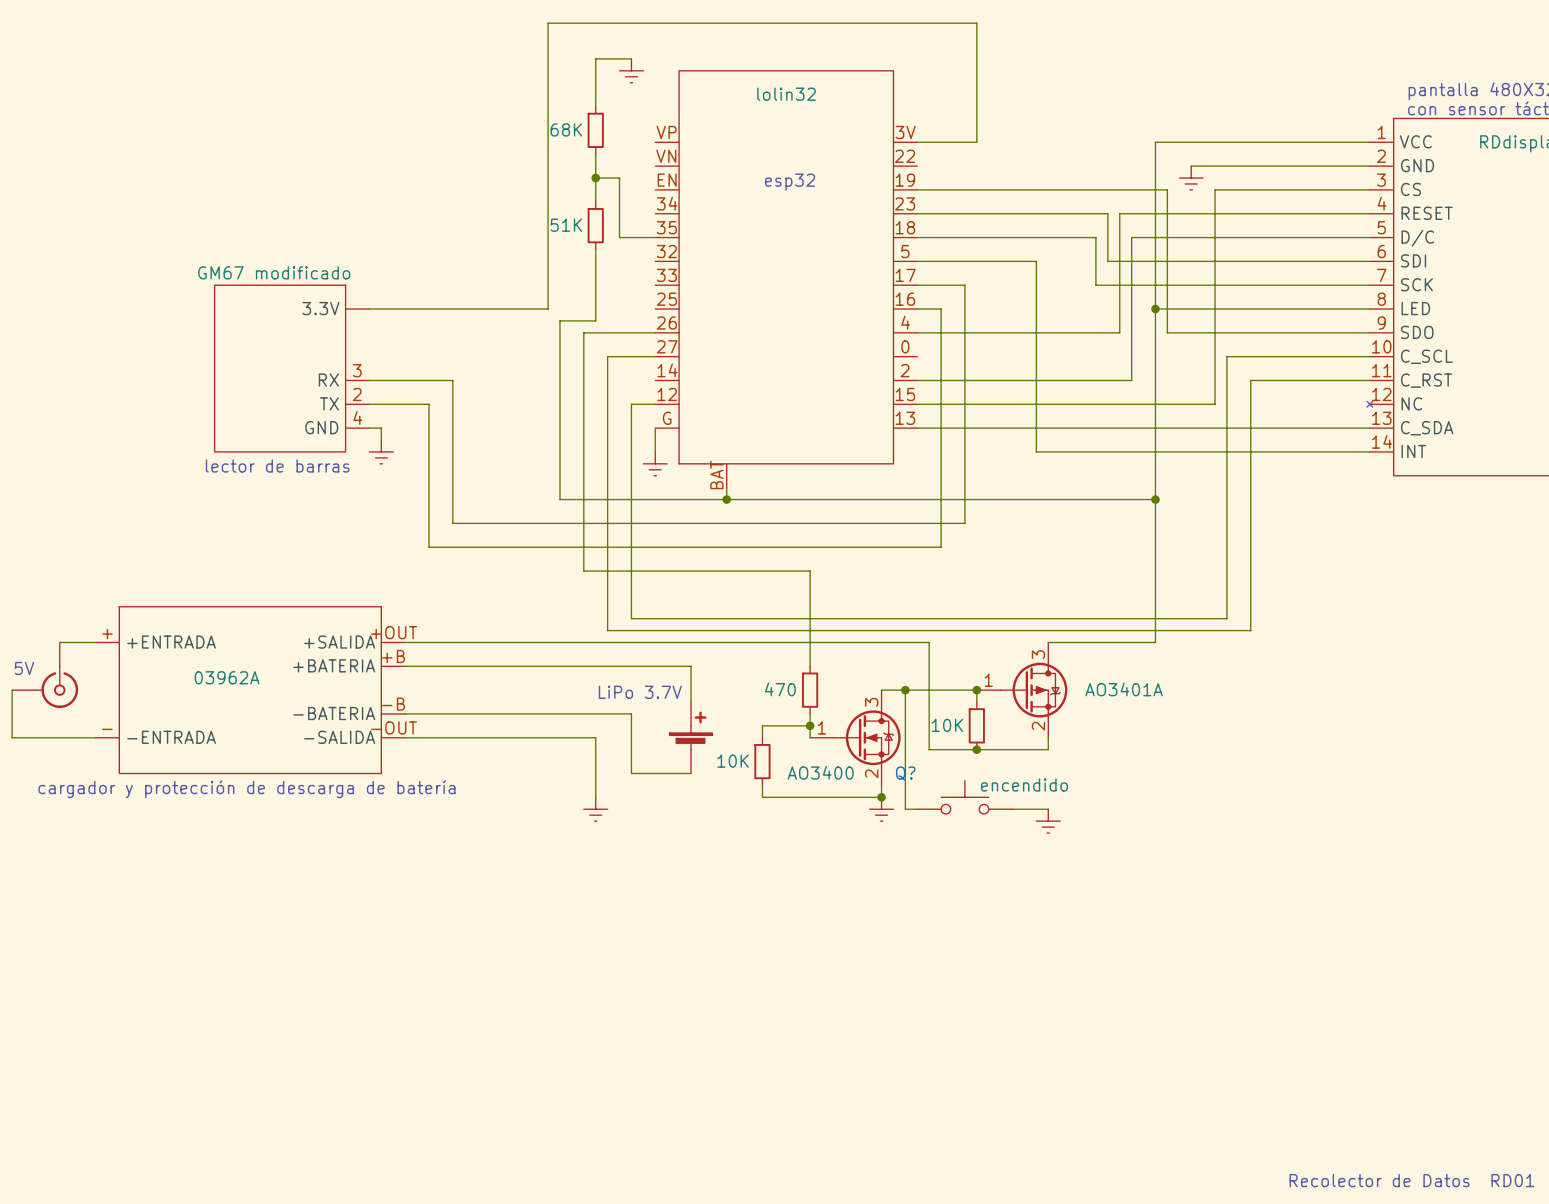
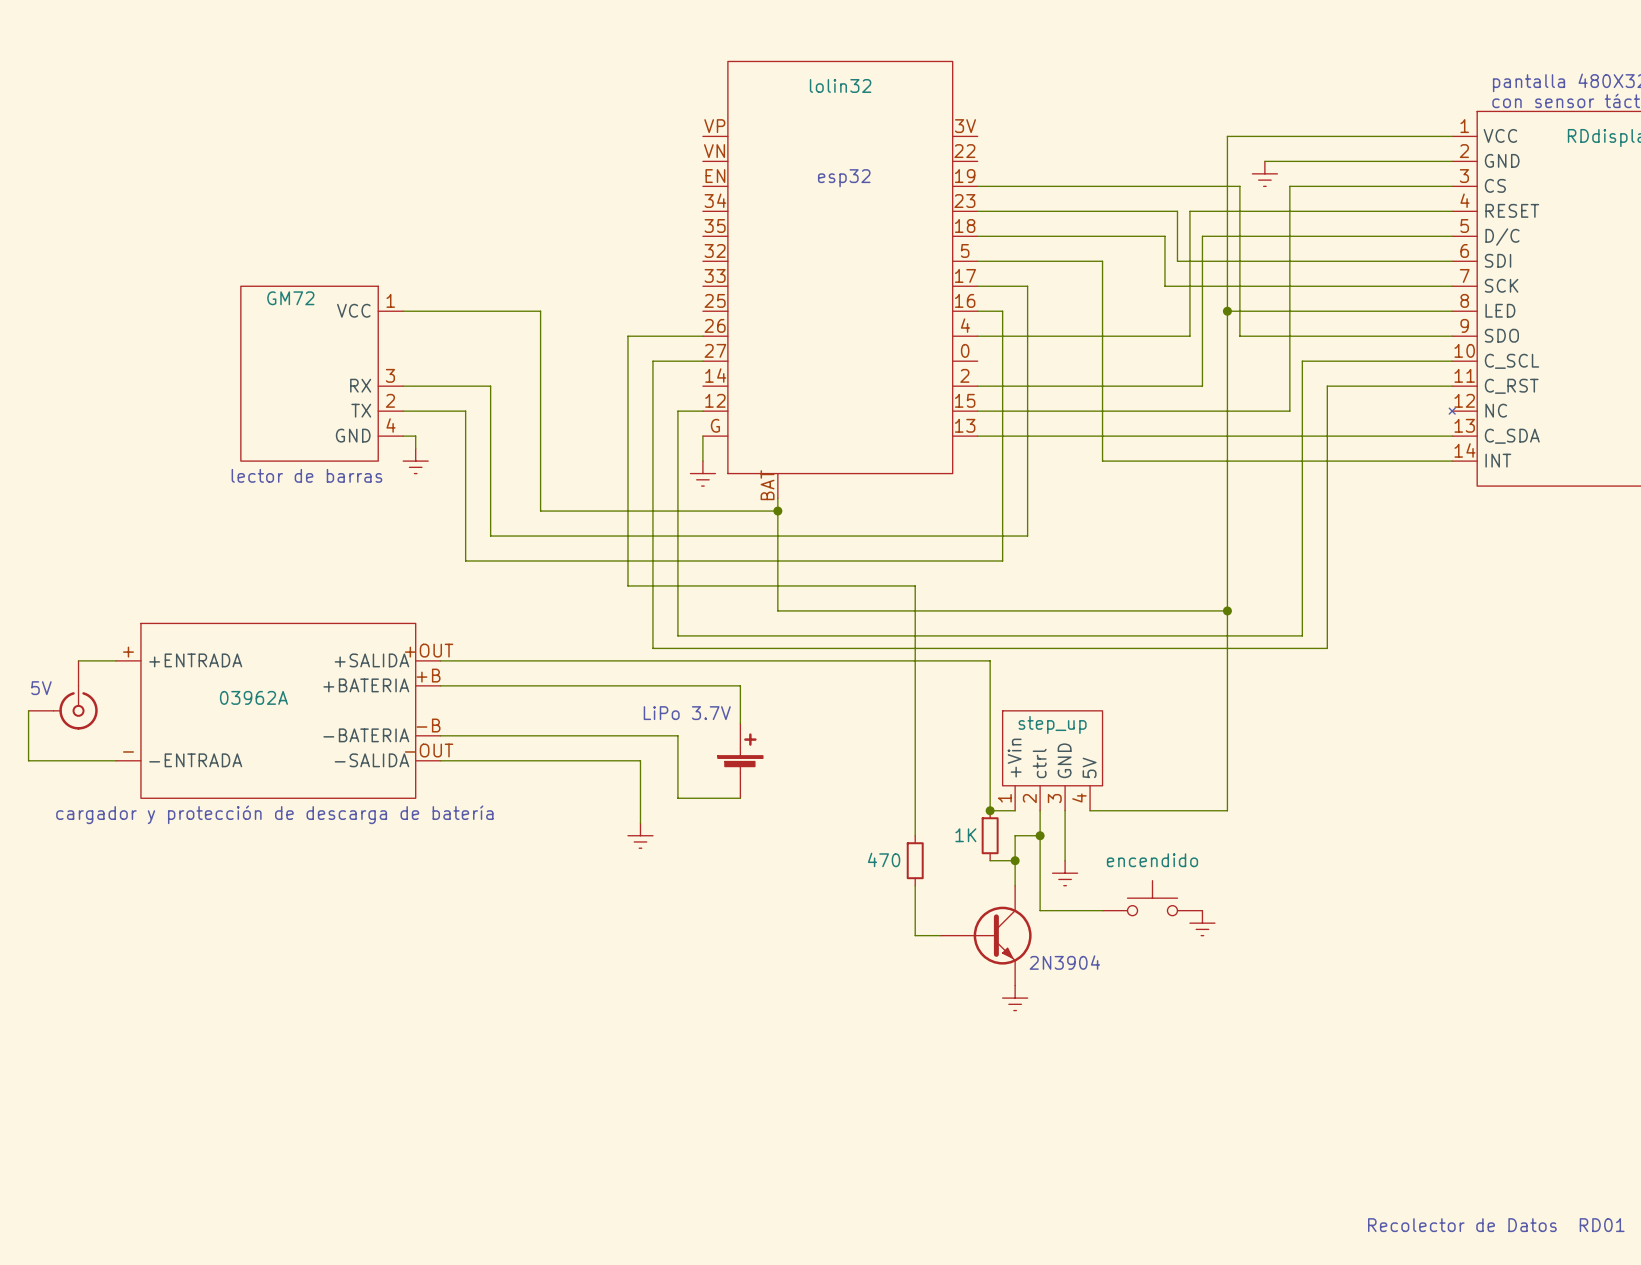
wire: (631, 58) (595, 58) (595, 106) -> none
power symbol: (631, 70) -> none
part: 68K (595, 130) -> none
wire: (917, 142) (976, 142) (976, 23) (548, 23) (548, 309) (500, 309) -> none
wire: (595, 154) (595, 201) -> none
wire: (595, 178) (619, 178) (619, 237) (655, 237) -> none
junction: (595, 178) -> none
part: 51K (595, 225) -> none
wire: (595, 249) (595, 320) (559, 320) (559, 499) -> (540, 311) (540, 511) (603, 511)
part value: GM67 modificado (274, 272) -> GM72 (290, 298)
part pin number: none -> 1 (390, 300)
part pin name: 3.3V (320, 308) -> VCC (353, 310)
wire: (726, 499) (1155, 499) -> (777, 511) (777, 610) (1227, 610)
junction: (1155, 499) -> none
wire: (810, 571) (810, 666) -> (865, 585) (915, 585) (915, 835)
junction: none -> (1227, 610)
wire: (1048, 642) (1155, 642) -> (1090, 810) (1227, 810) (1227, 660)
part position: (810, 690) -> (915, 860)
wire: (881, 690) (976, 690) (976, 702) -> none
wire: (905, 690) (905, 809) (917, 809) -> none
junction: (905, 690) -> none
junction: (976, 690) -> none
part: AO3401A (1022, 690) -> none
wire: (810, 713) (810, 737) -> none
wire: (810, 725) (762, 725) (762, 737) -> none
junction: (810, 725) -> none
part: 10K (976, 725) -> none
Q?: AO3400 (855, 737) -> none
part: none -> step_up (1052, 760)
wire: (1048, 737) (1048, 749) (929, 749) -> (1015, 810) (990, 810) (990, 773)
junction: (976, 749) -> none
part: 10K (762, 761) -> none
part value position: encendido (1024, 784) -> encendido (1152, 860)
wire: (762, 785) (762, 797) (881, 797) (881, 785) -> none
junction: none -> (990, 810)
wire: none -> (1040, 810) (1040, 910) (1102, 910)
wire: none -> (1065, 810) (1065, 860)
junction: (881, 797) -> none
part position: (964, 797) -> (1152, 898)
power symbol: (881, 809) -> none
part: none -> 1K (990, 835)
wire: none -> (1040, 835) (1015, 835) (1015, 885)
junction: none -> (1040, 835)
wire: (1012, 809) (1048, 809) -> none
power symbol position: (1048, 821) -> (1065, 873)
wire: none -> (990, 860) (1015, 860)
junction: none -> (1015, 860)
wire: none -> (915, 885) (915, 935) (940, 935)
power symbol: none -> (1202, 923)
part: none -> (985, 935)
text: none -> 2N3904 (1064, 962)
power symbol: none -> (1015, 998)

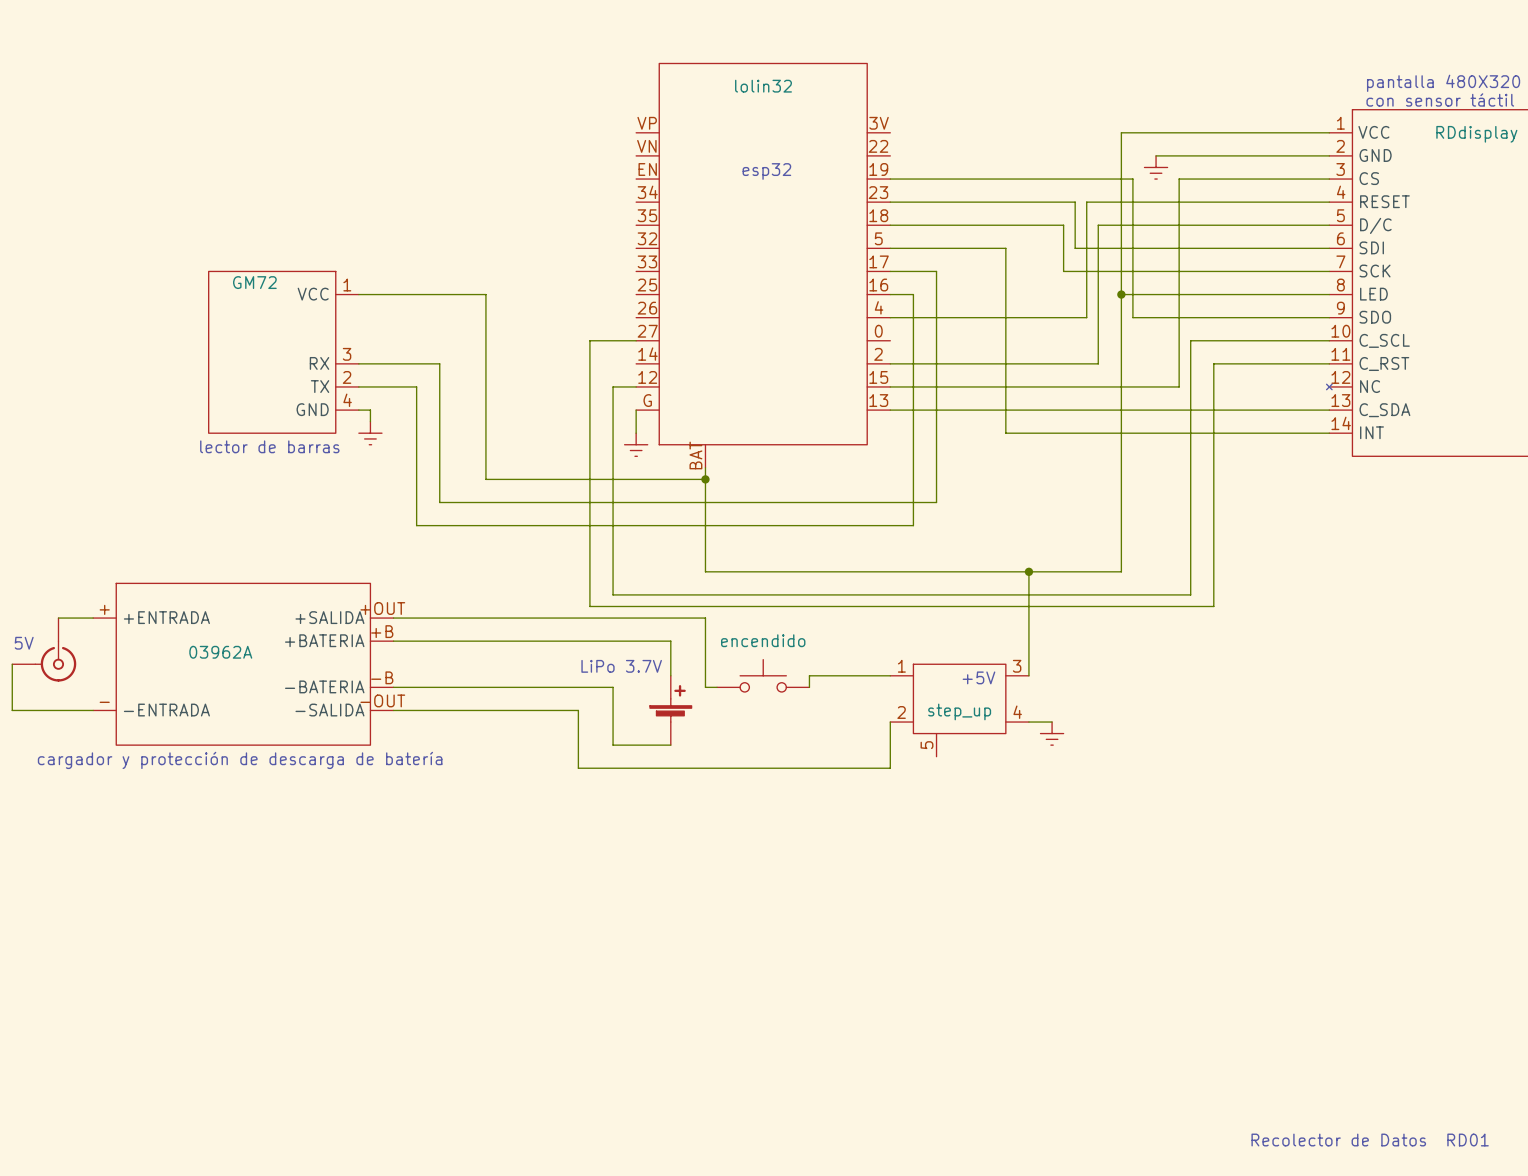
wire: (702, 336) (627, 336) (627, 585) (915, 585) (915, 835) -> none
wire: none -> (1028, 571) (1028, 675)
junction: none -> (1028, 571)
wire: (1227, 610) (1227, 810) (1090, 810) -> none
junction: (1227, 610) -> none
wire: (777, 660) (990, 660) (990, 810) (1015, 810) -> (705, 618) (705, 687) (717, 687)
part symbol: [1002, 710, 1103, 811] -> [890, 664, 1029, 757]
part: none -> encendido (763, 675)
wire: none -> (890, 675) (809, 675) (809, 687)
part value position: step_up (1052, 724) -> step_up (959, 711)
text: none -> +5V (978, 677)
wire: none -> (890, 722) (890, 768) (578, 768)
power symbol: none -> (1052, 733)
junction: (990, 810) -> none
wire: (1040, 810) (1040, 910) (1102, 910) -> none
wire: (1065, 810) (1065, 860) -> none
power symbol: (640, 835) -> none
part: 1K (990, 835) -> none
wire: (1040, 835) (1015, 835) (1015, 885) -> none
junction: (1040, 835) -> none
part: 470 (915, 860) -> none
wire: (990, 860) (1015, 860) -> (1028, 722) (1052, 722)
junction: (1015, 860) -> none
power symbol: (1065, 873) -> none
wire: (915, 885) (915, 935) (940, 935) -> none
part: encendido (1152, 898) -> none
power symbol: (1202, 923) -> none
part: (985, 935) -> none
text: 2N3904 (1064, 962) -> none
power symbol: (1015, 998) -> none

